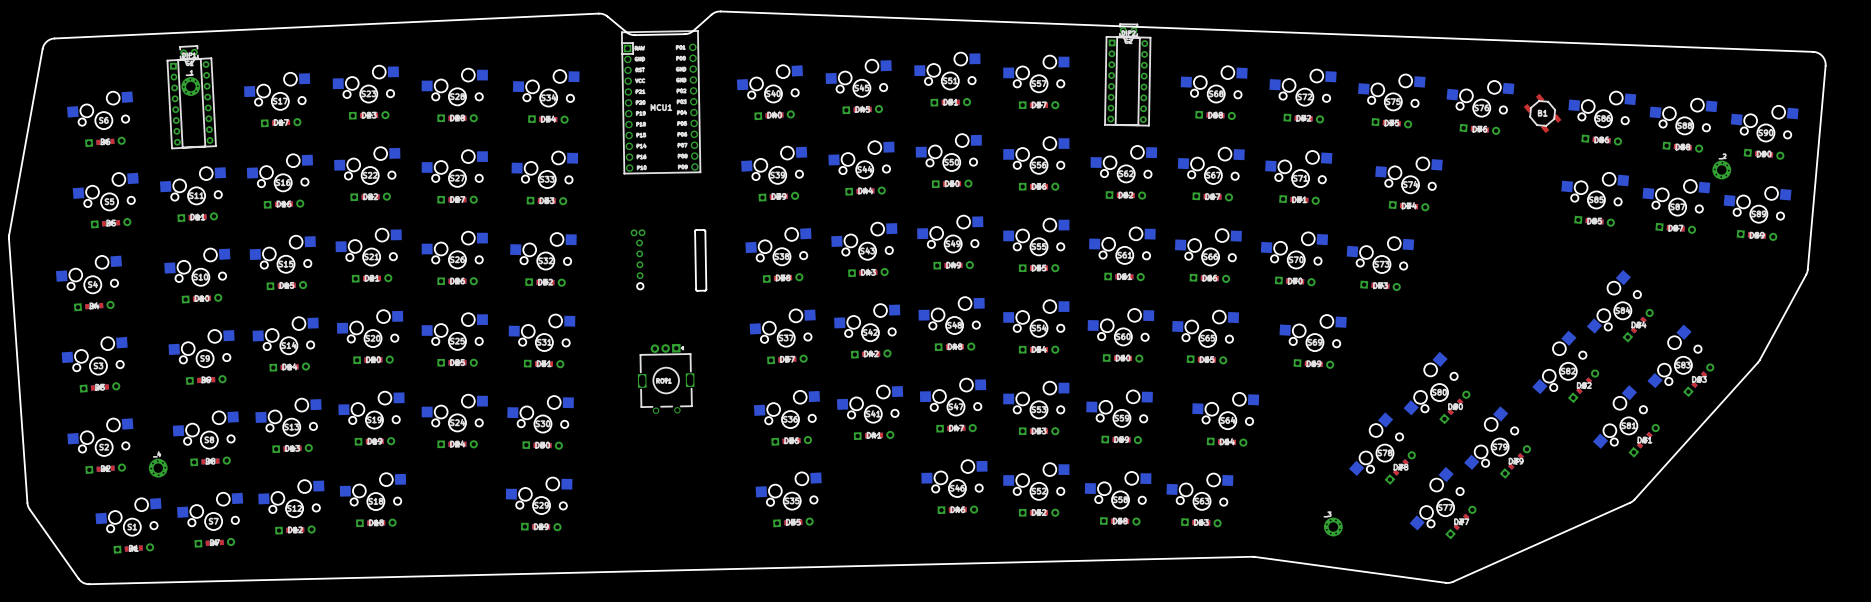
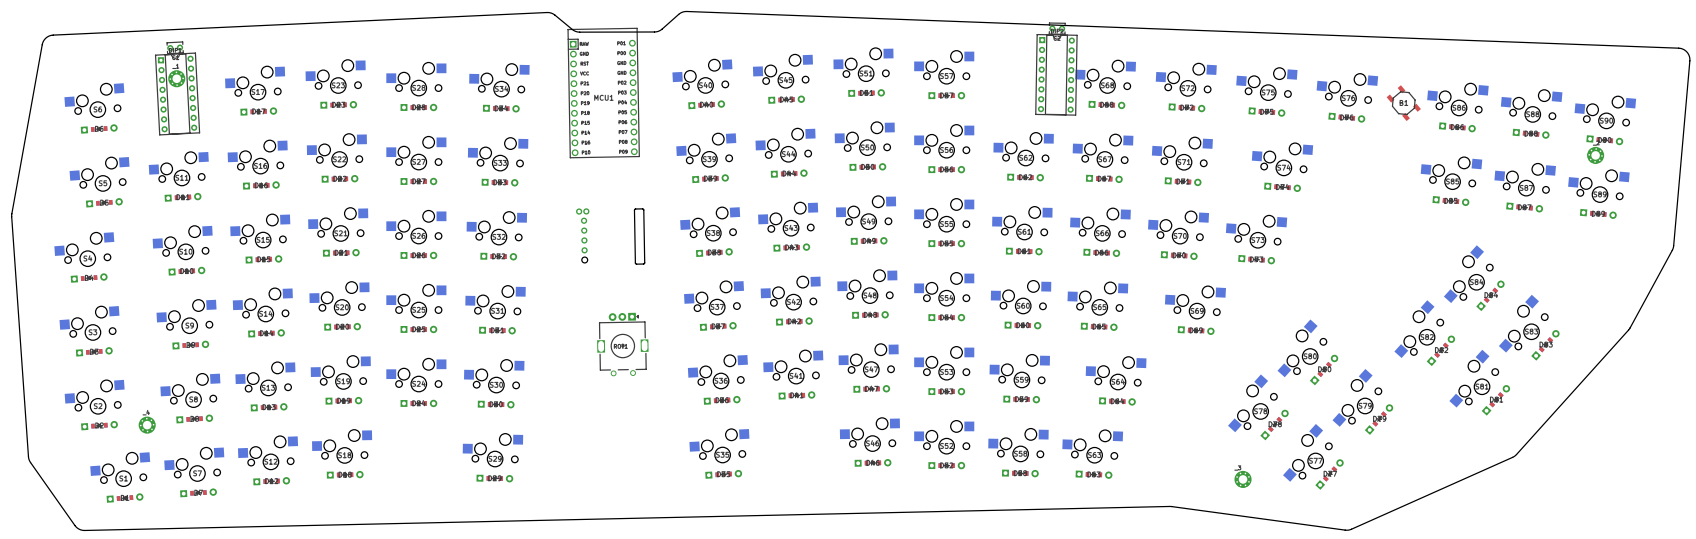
part position: (1128, 30) -> (1057, 28)
board edge: (626, 32) (634, 35) (688, 33) (712, 13) (720, 11) (1814, 52) (1823, 57) (1825, 65) (1807, 270) (1759, 361) (1633, 500) (1449, 582) (1252, 556) (89, 584) (83, 582) (78, 578) -> (572, 29) (579, 32) (655, 31) (661, 29) (679, 13) (686, 11) (1680, 48) (1686, 52) (1689, 60) (1673, 246) (1629, 329) (1515, 455) (1348, 530) (1169, 506) (84, 530) (74, 525)
part position: (1127, 81) -> (1056, 74)
part position: (1721, 170) -> (1595, 155)
part position: (666, 378) -> (622, 344)
part position: (1333, 527) -> (1243, 479)

